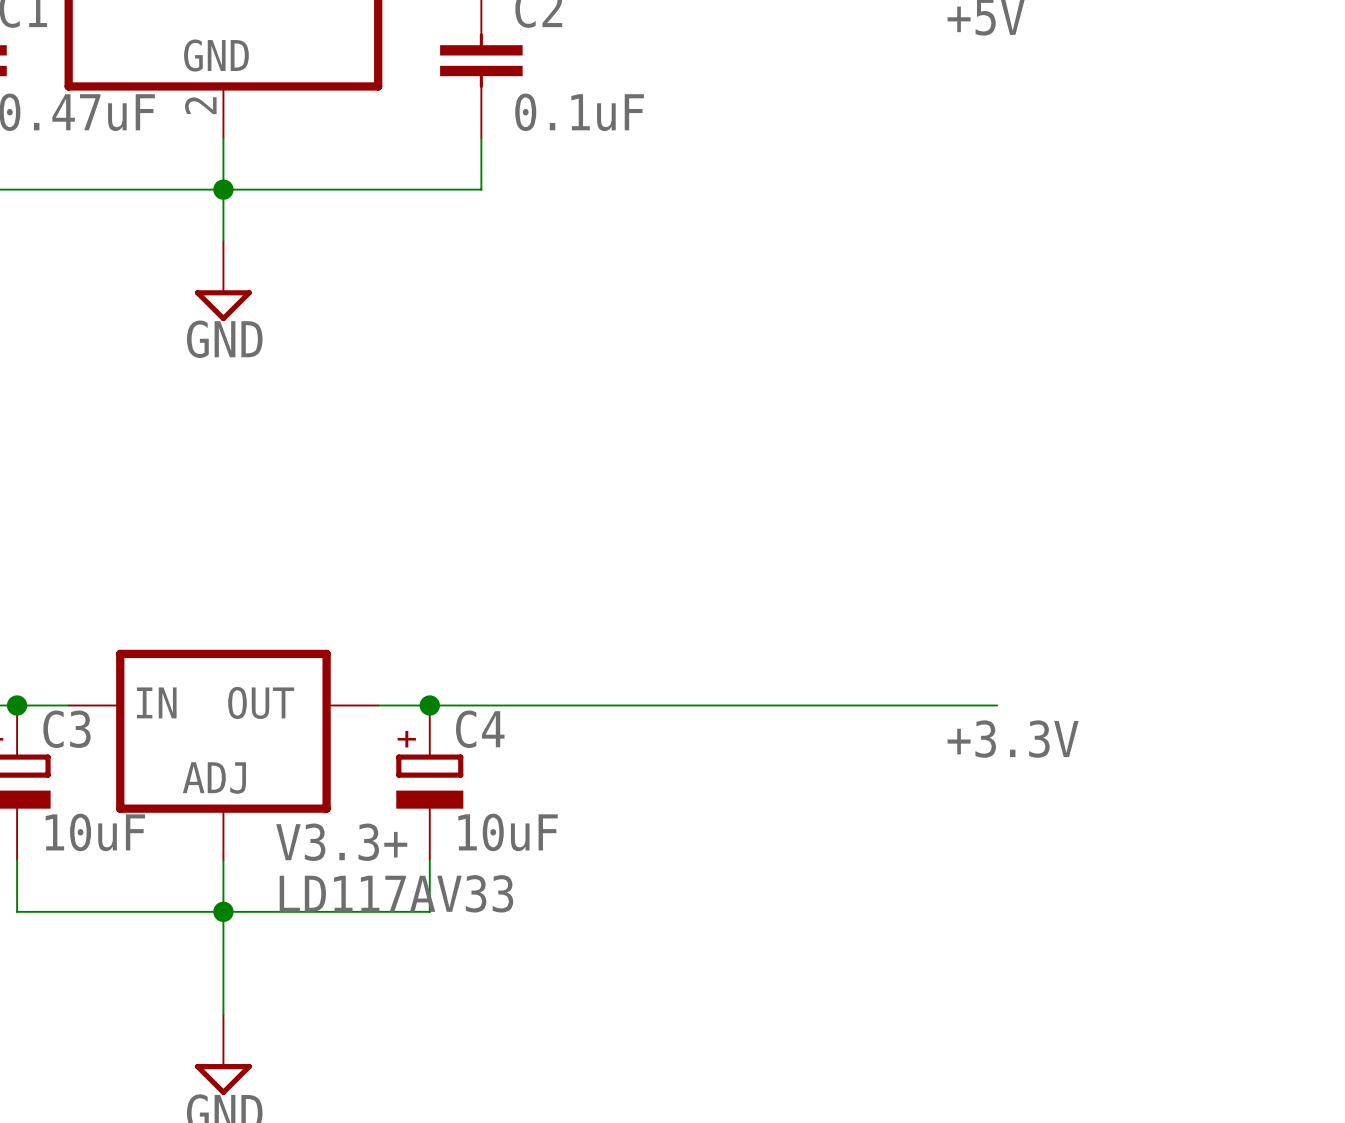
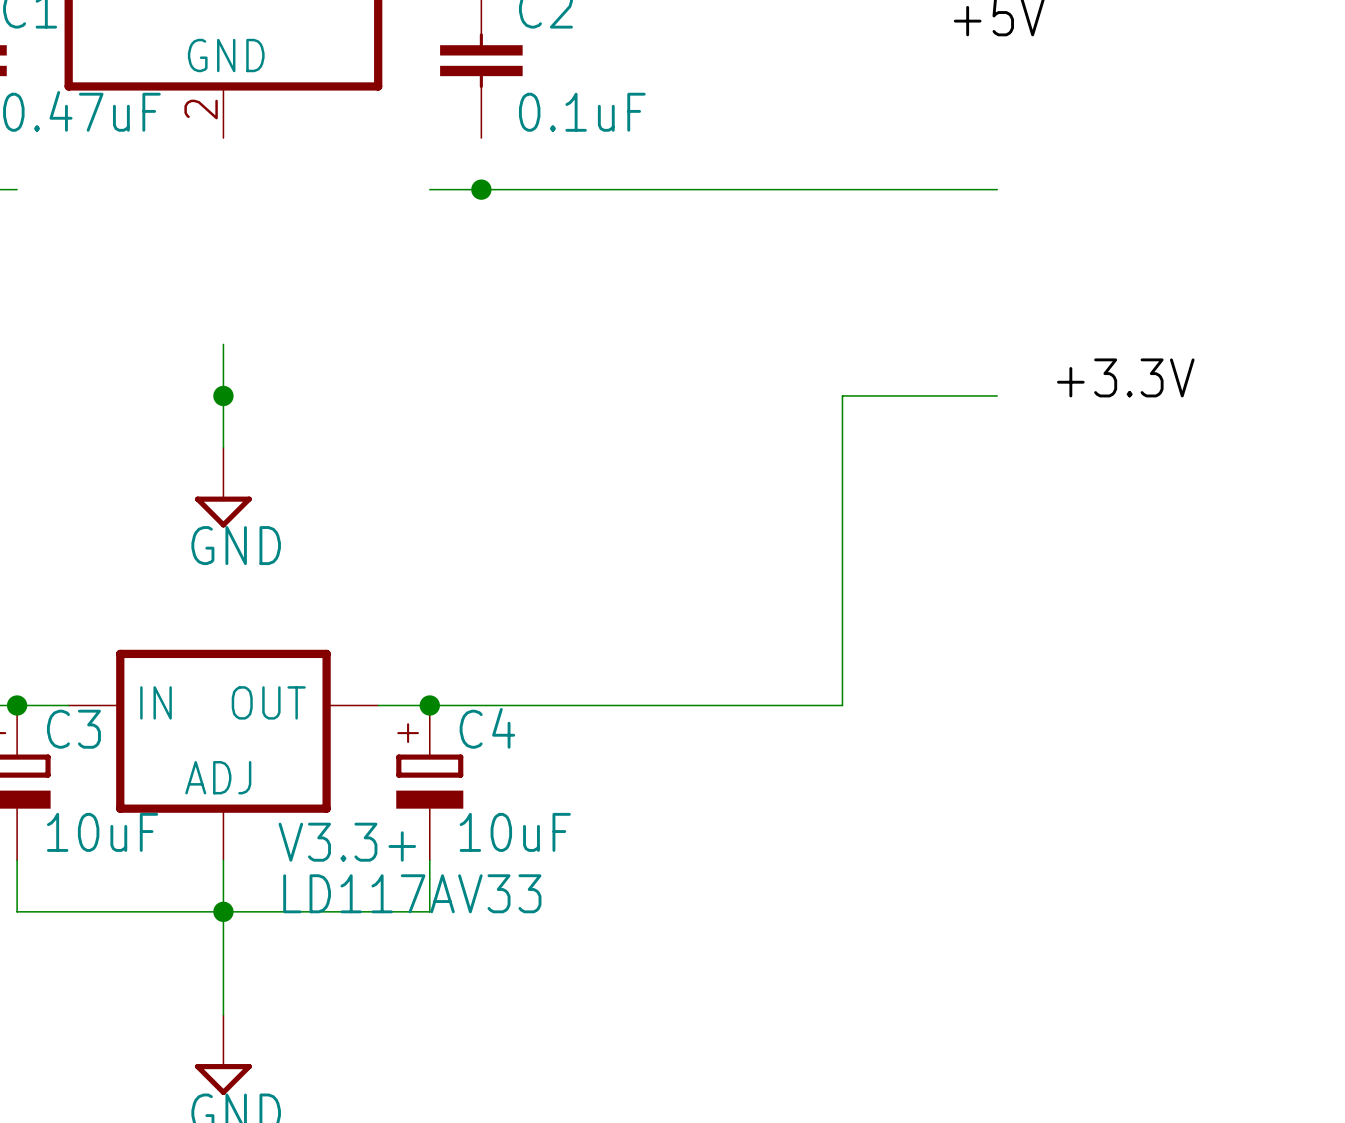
wire: (223, 138) (223, 241) -> (223, 344) (223, 447)
wire: (481, 138) (481, 189) -> (997, 189) (481, 189)
wire: (17, 189) (429, 189) -> none
junction: (223, 189) -> none
junction: none -> (481, 189)
power symbol position: GND (223, 281) -> GND (223, 487)
junction: none -> (223, 395)
wire: (842, 705) (997, 705) -> (842, 705) (842, 395) (997, 395)
label position: +3.3V (1013, 739) -> +3.3V (1125, 377)

